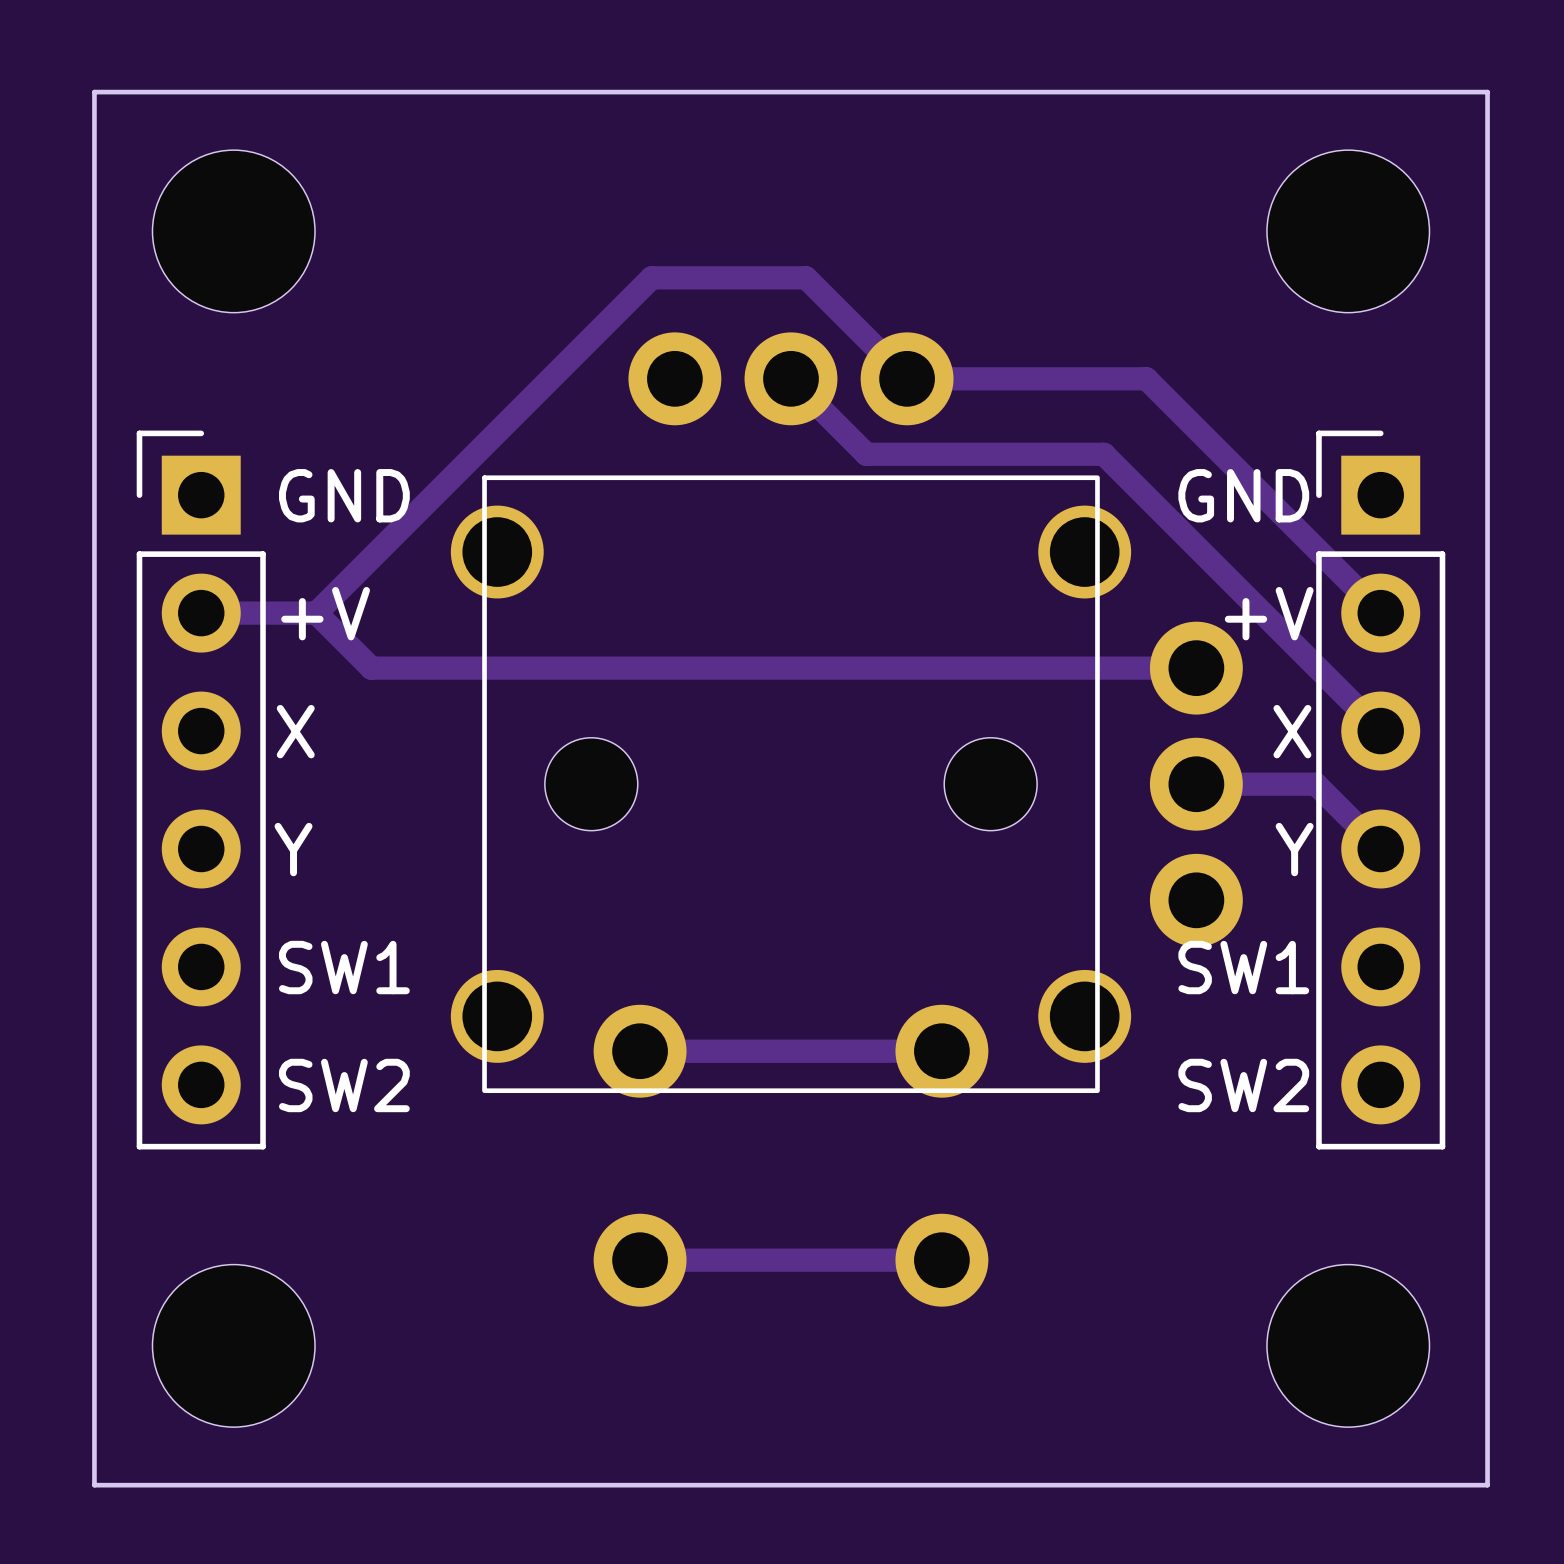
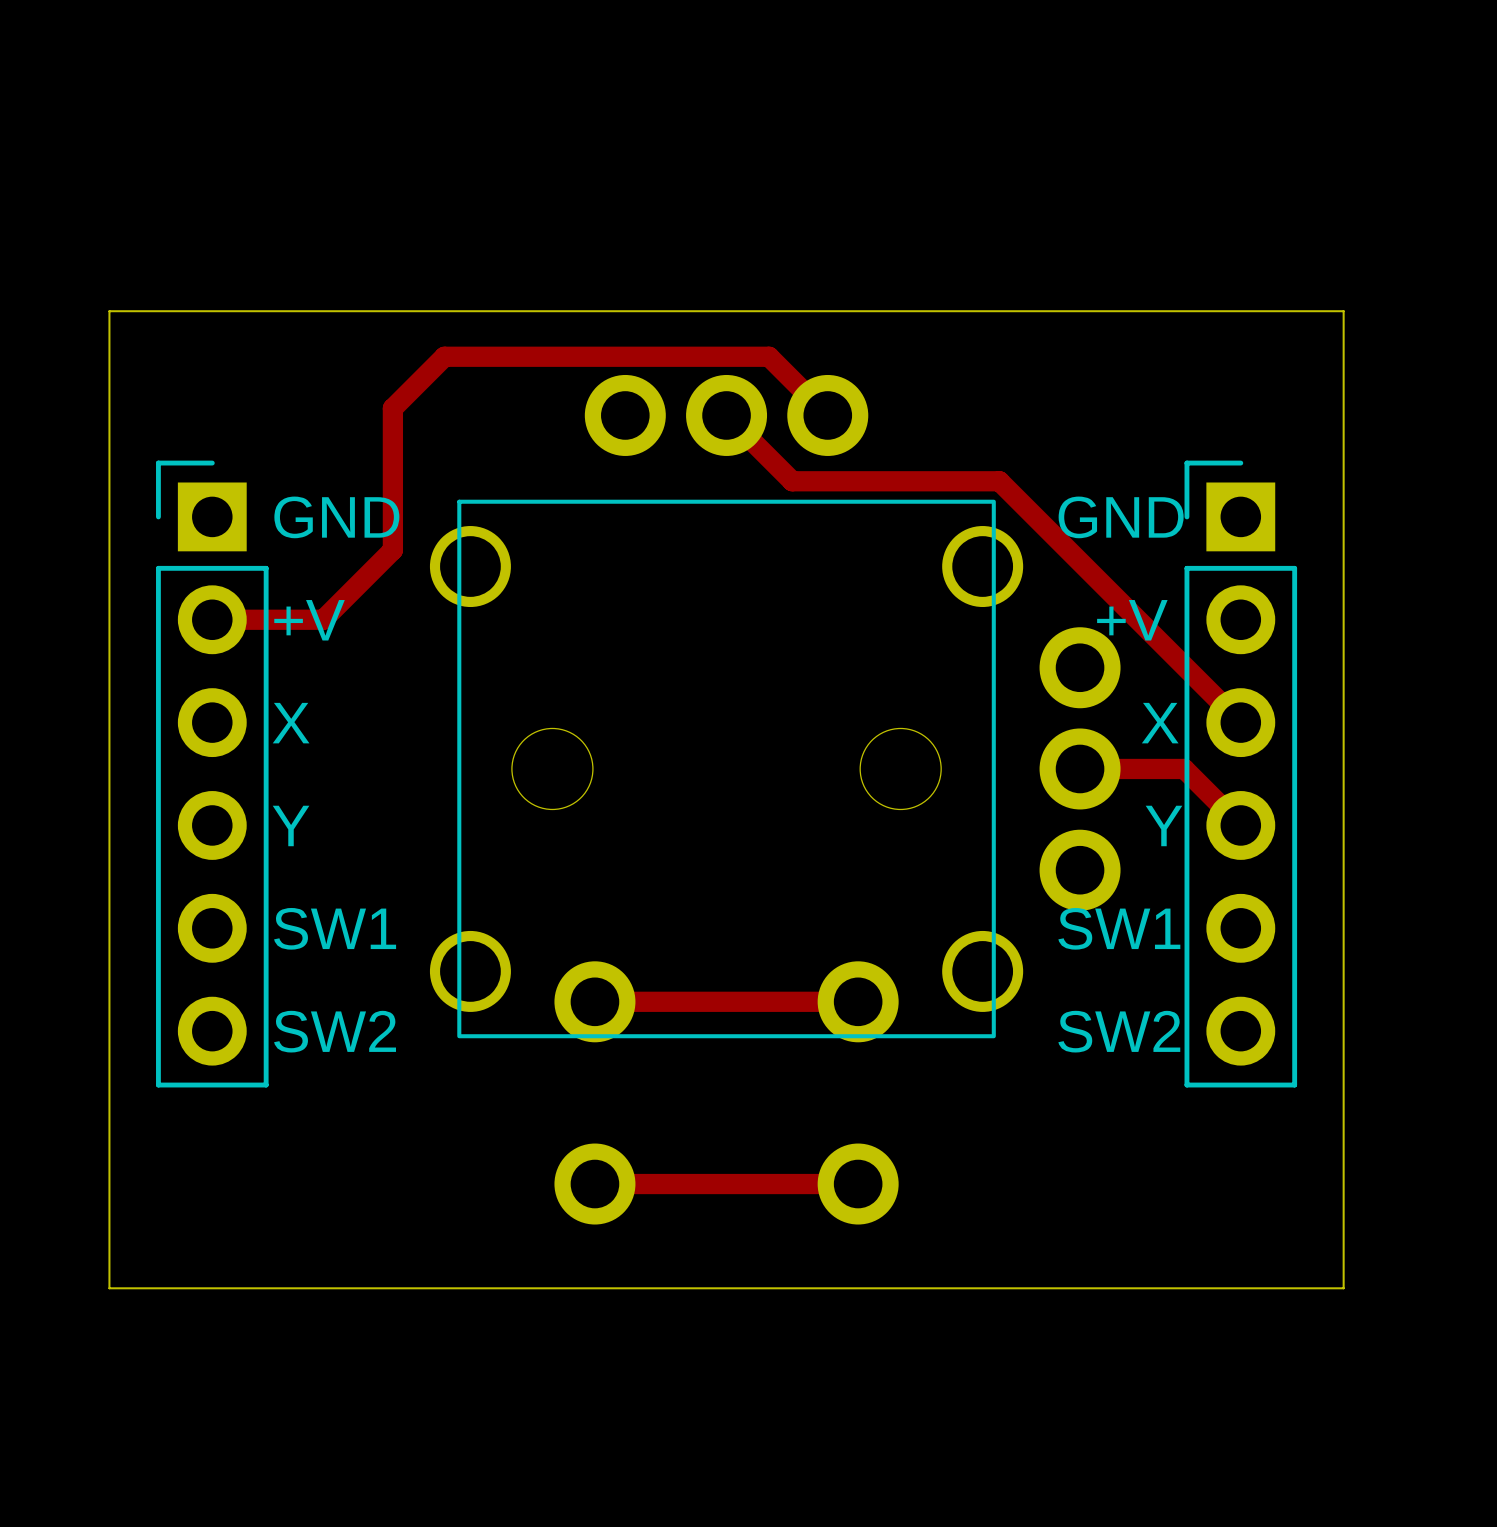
board edge: (94, 92) (1487, 92) (1487, 1485) (94, 1485) (94, 92) -> (109, 311) (109, 1288) (1343, 1288) (1343, 311) (109, 311)
part: (233, 231) -> none
part: (1348, 231) -> none
track: (839, 311) (806, 277) (651, 277) (316, 613) (371, 668) (1196, 668) -> (769, 356) (444, 356) (392, 408) (392, 550) (323, 619) (312, 619)
track: (907, 378) (1146, 378) (1380, 613) -> none
part: (233, 1345) -> none
part: (1348, 1345) -> none

